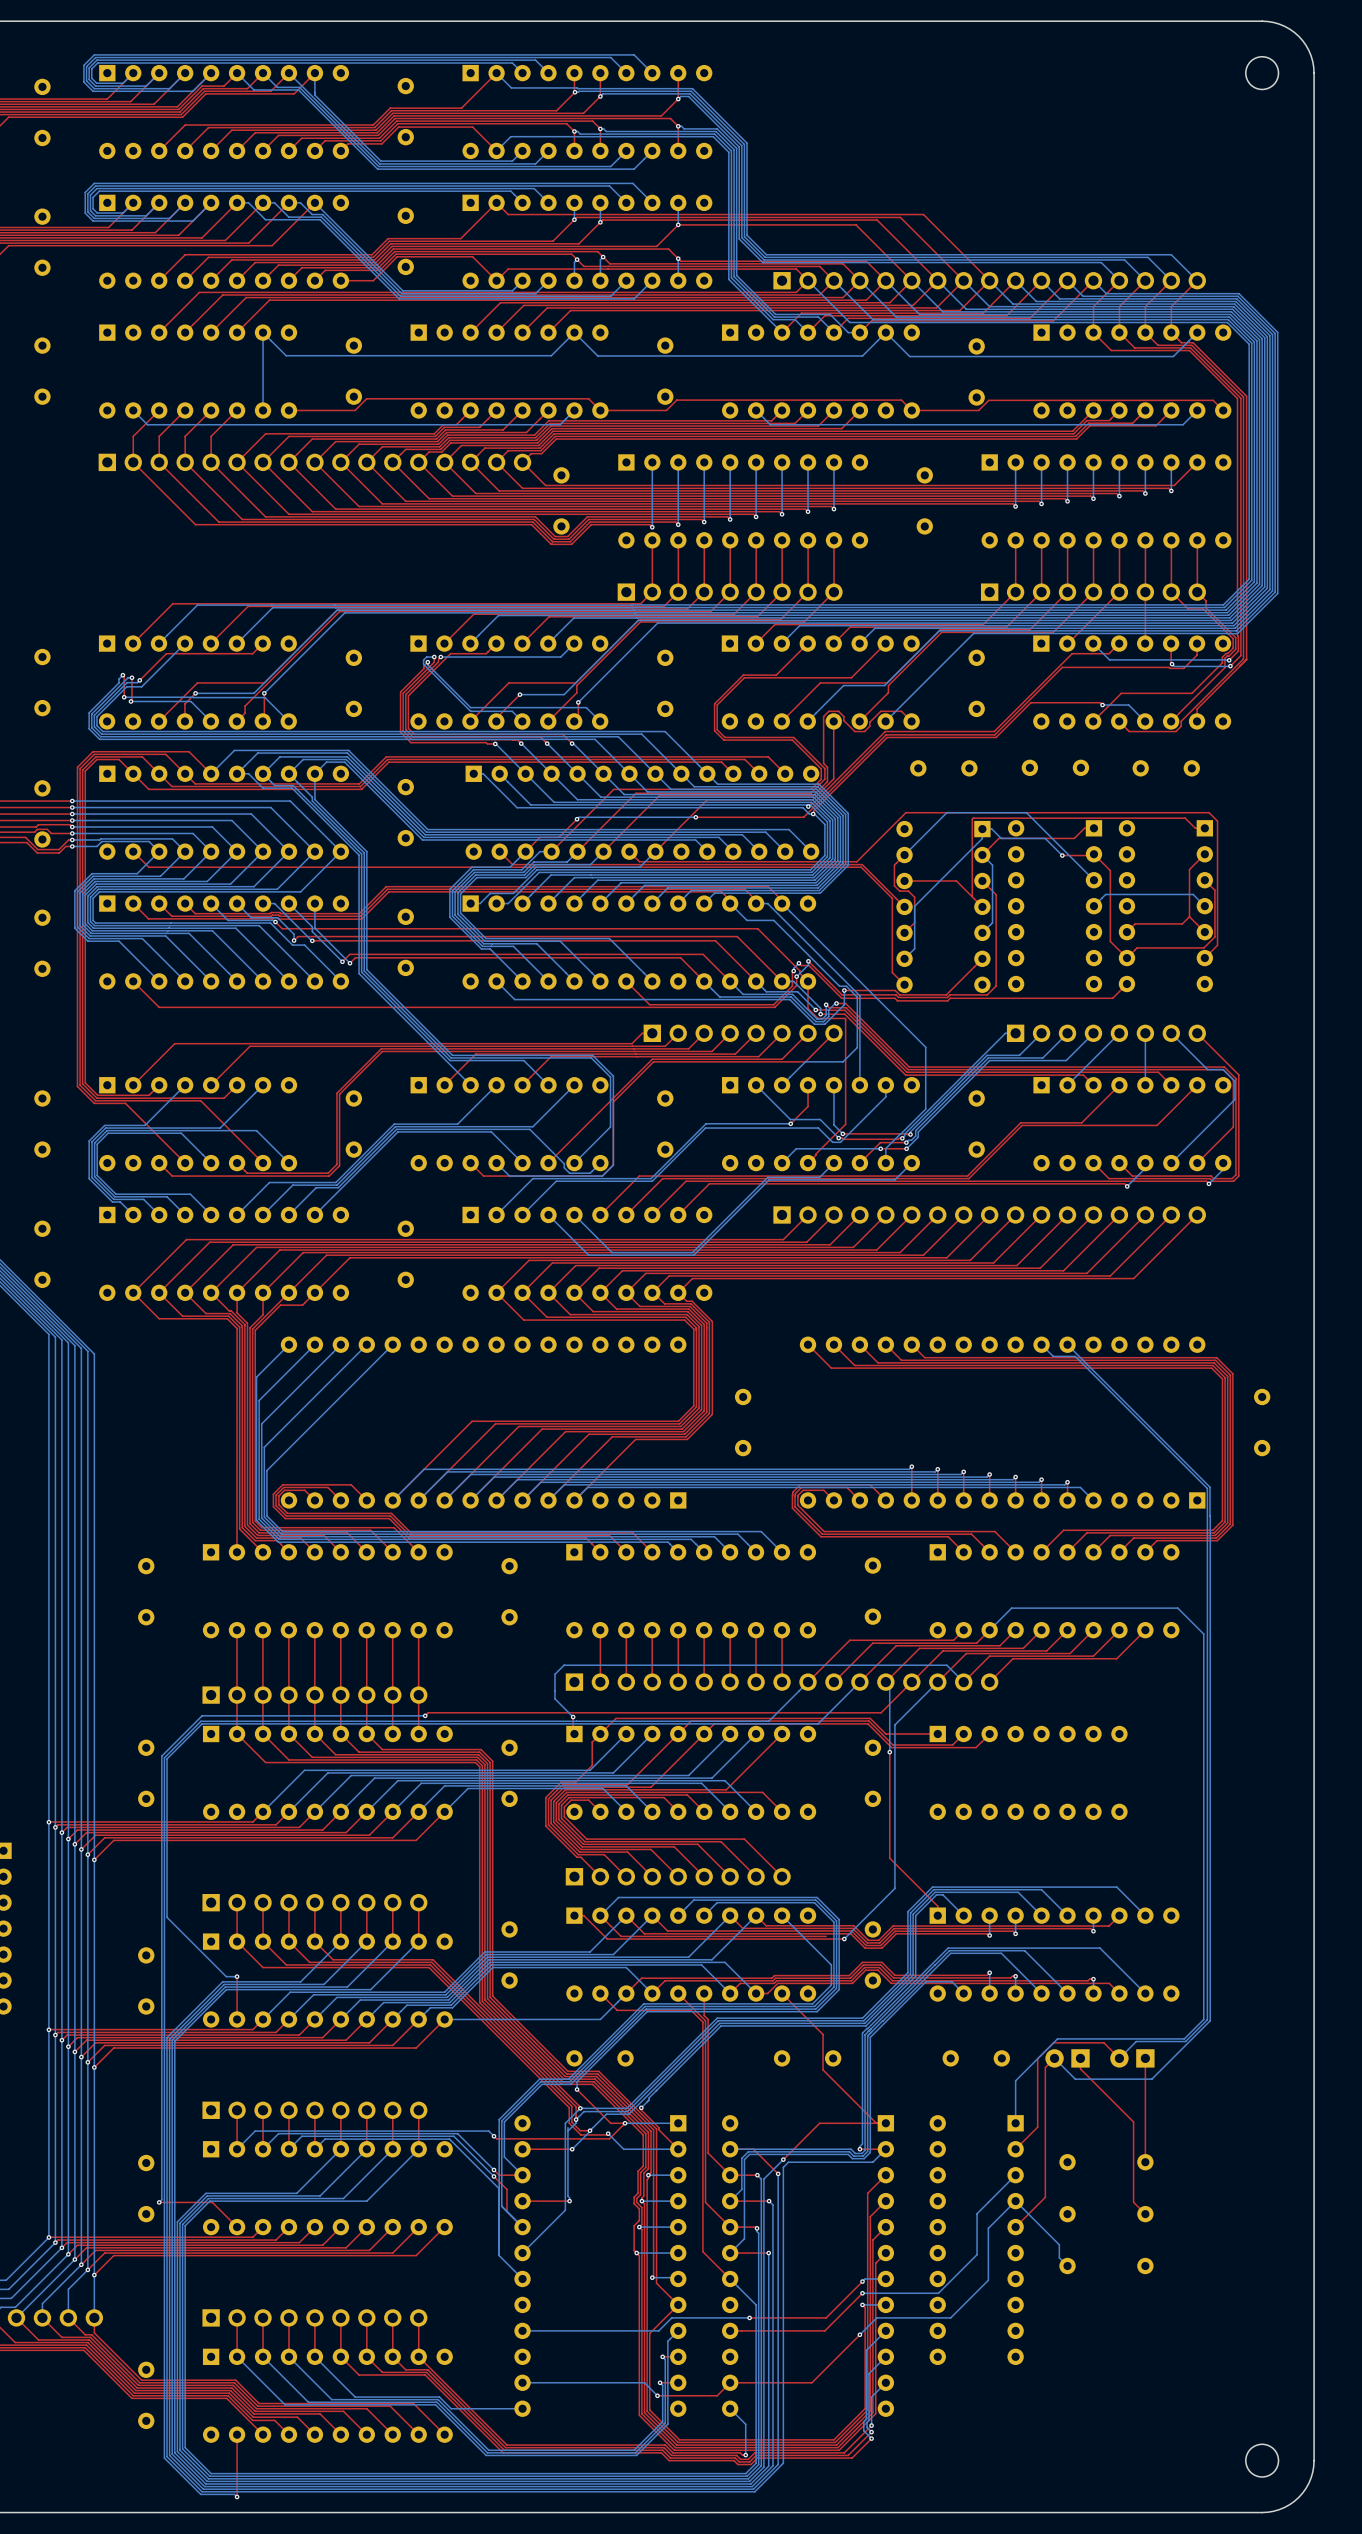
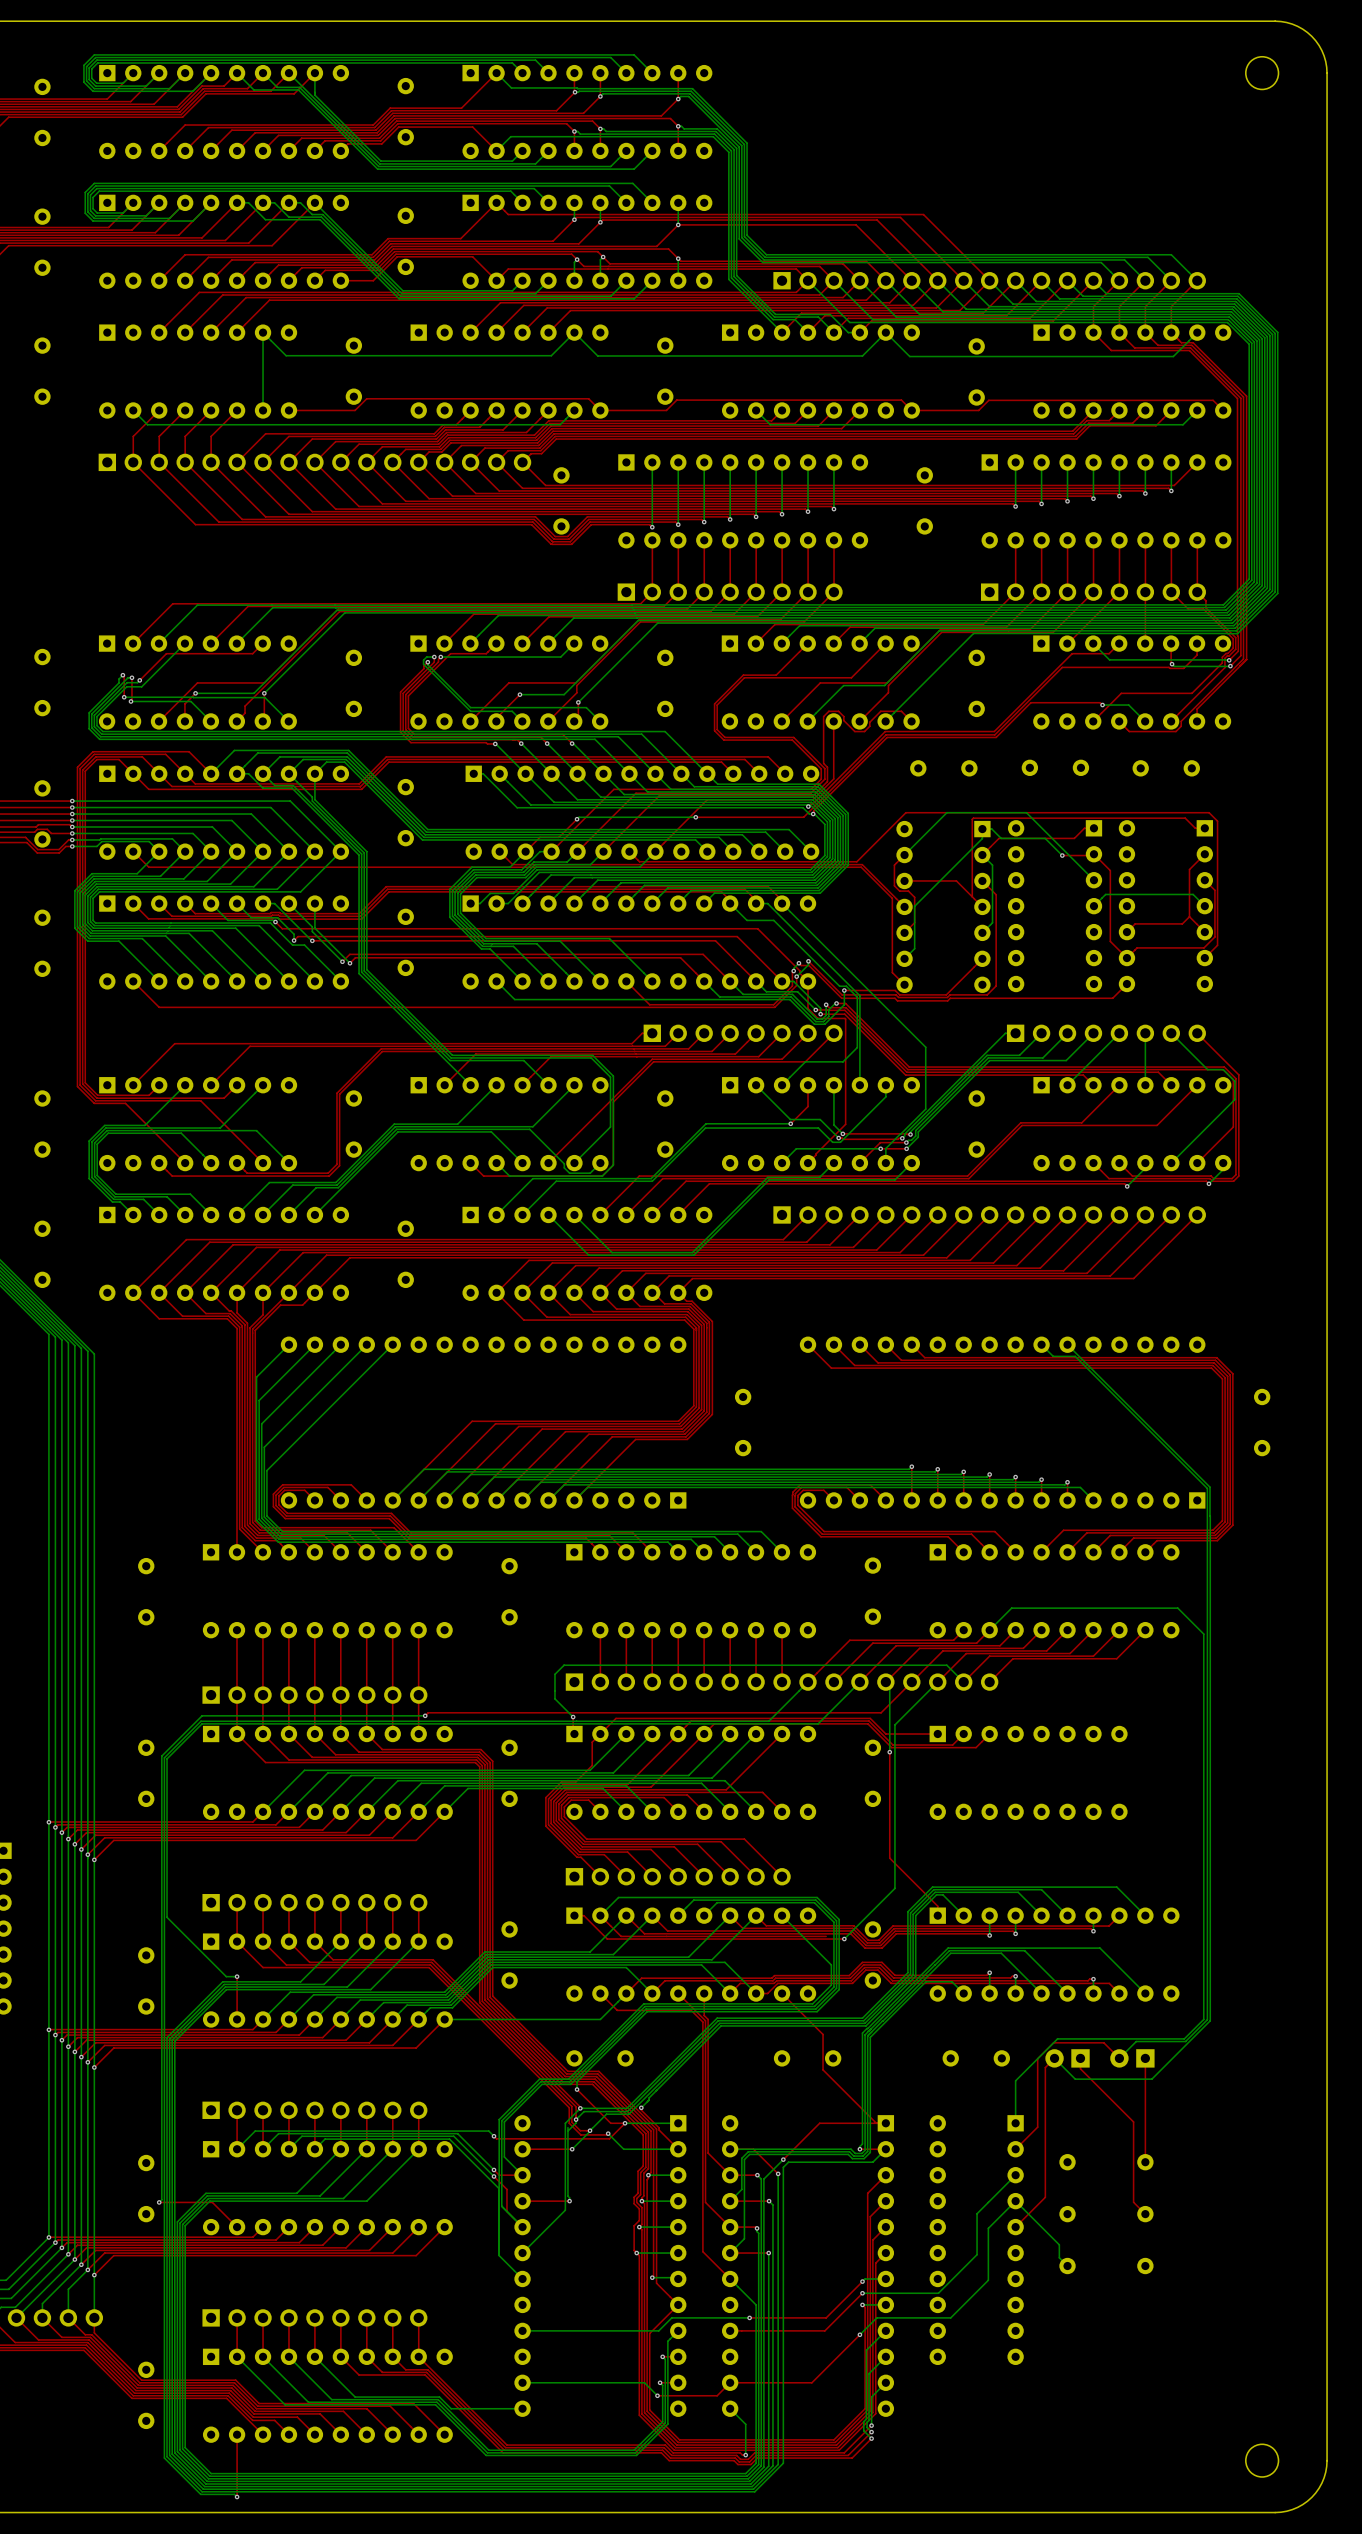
board edge: (1262, 21) (1284, 26) (1298, 36) (1311, 55) (1314, 73) (1314, 2460) (1311, 2477) (1298, 2497) (1284, 2507) (1262, 2512) -> (1262, 21) (1286, 22) (1307, 32) (1321, 50) (1327, 73) (1327, 2460) (1321, 2483) (1307, 2501) (1286, 2511) (1262, 2512)

